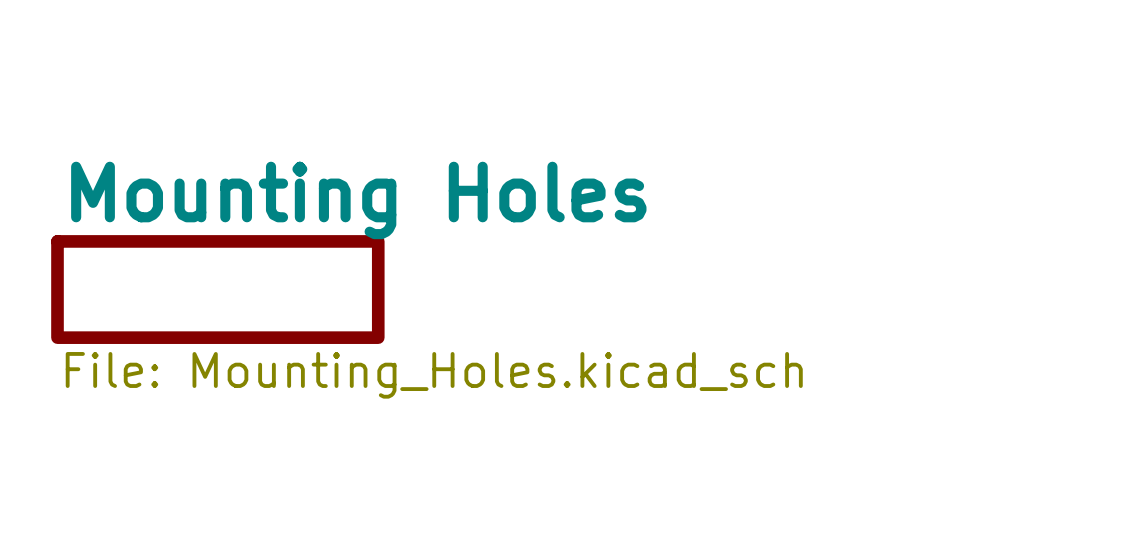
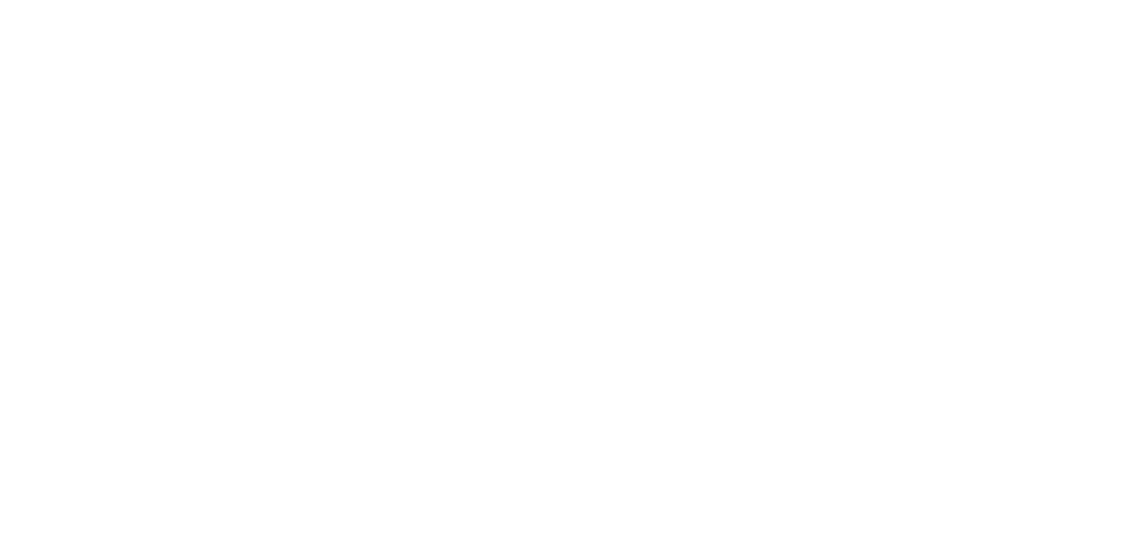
sheet Mounting Holes: File: Mounting_Holes.kicad_sch (217, 289) -> none

